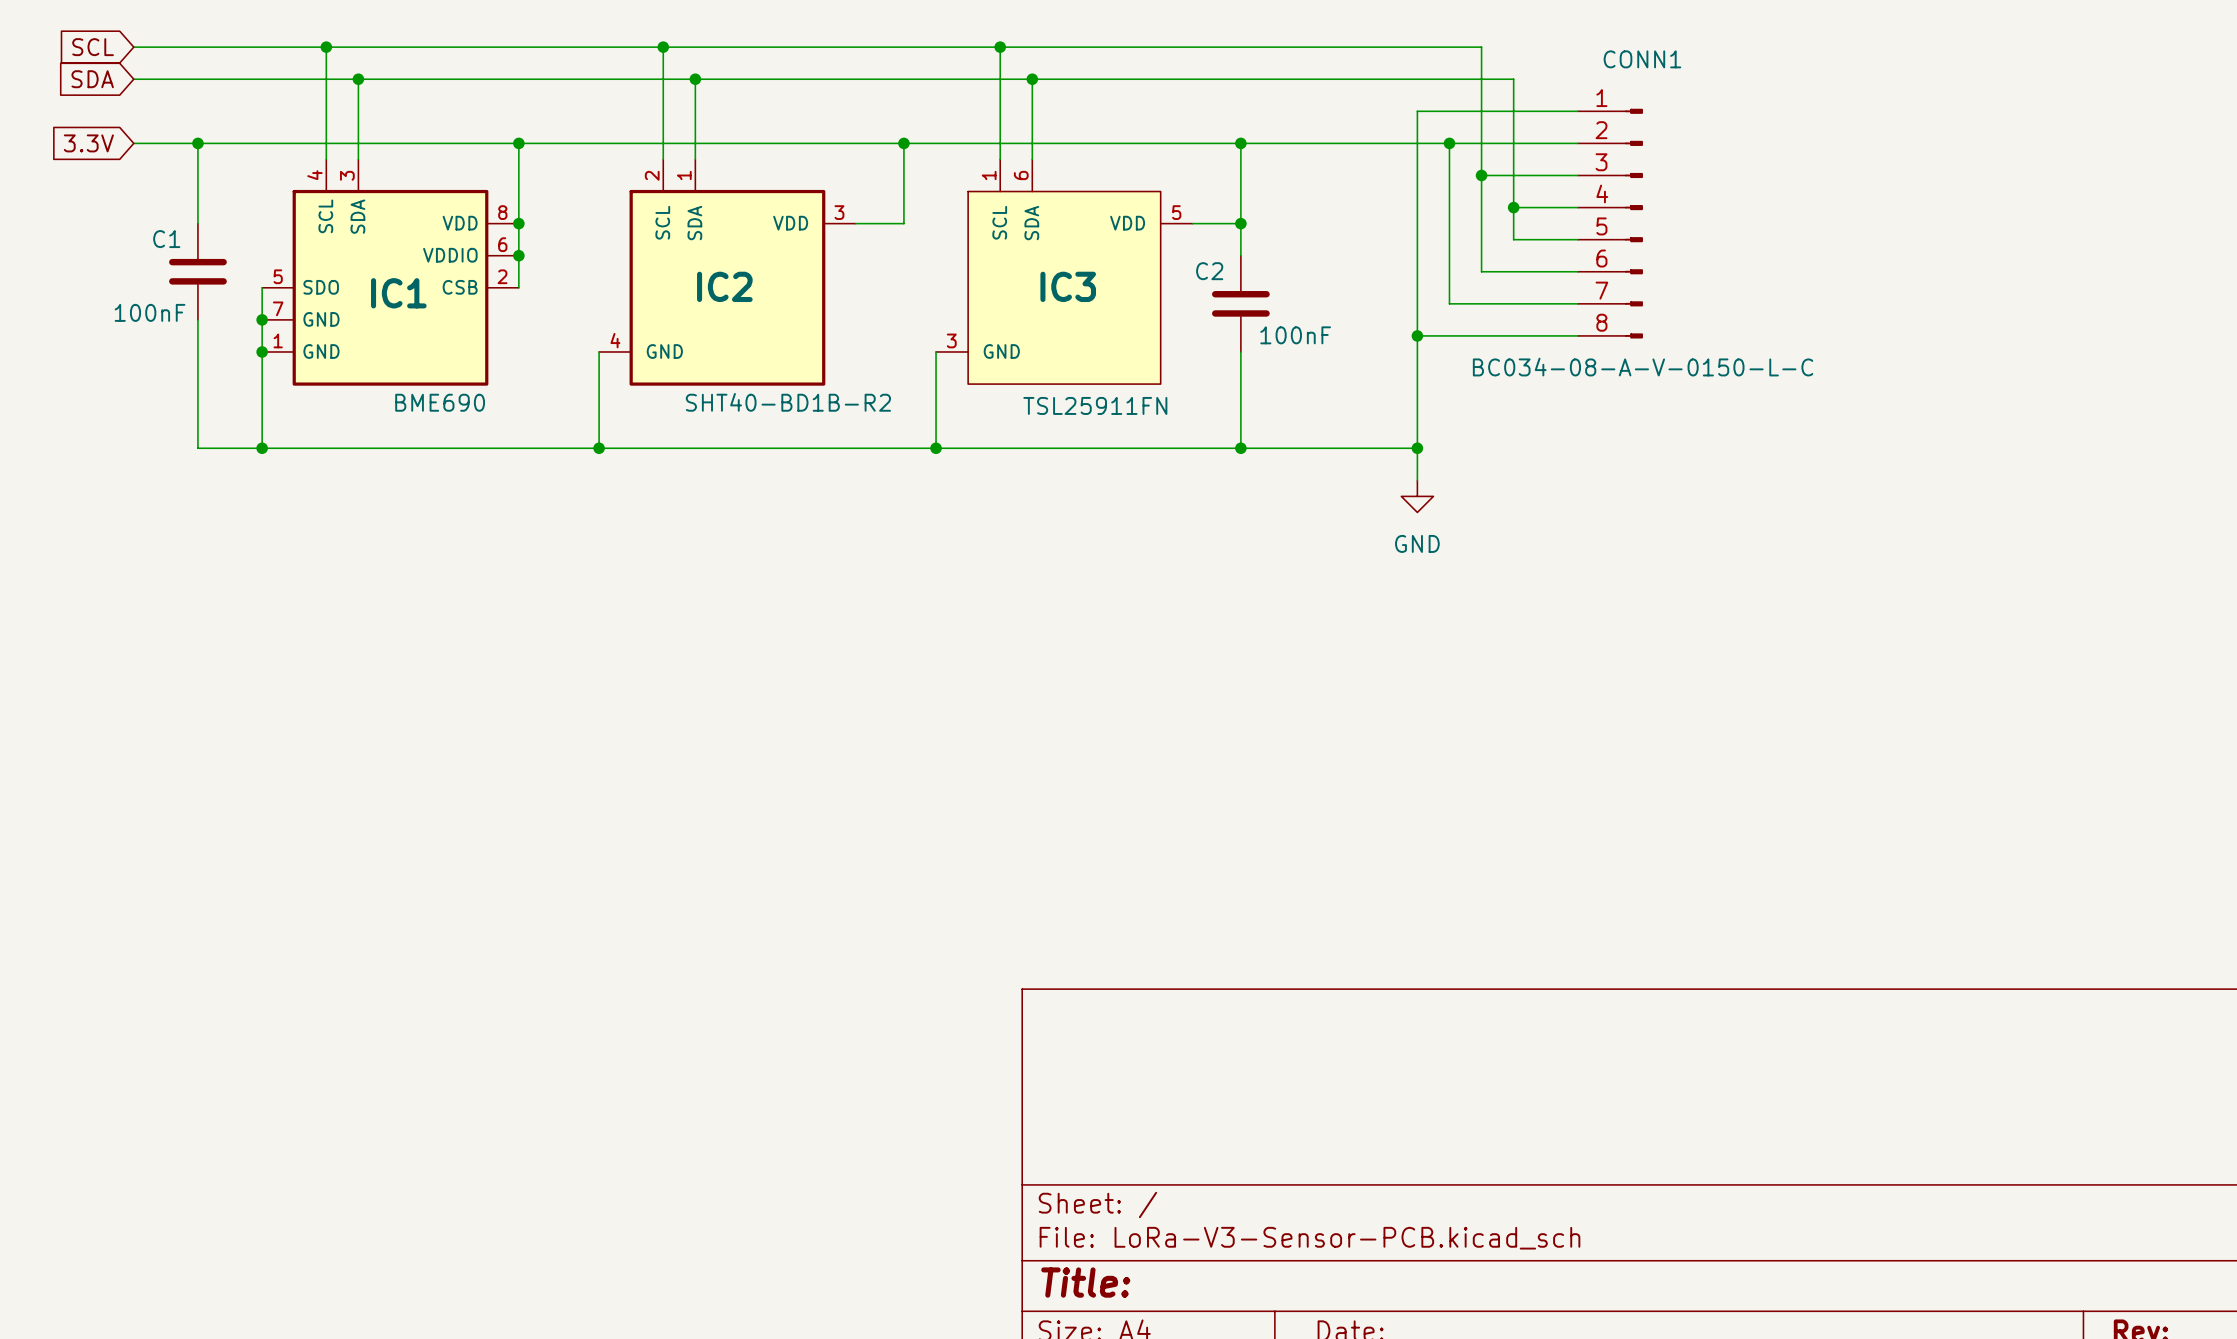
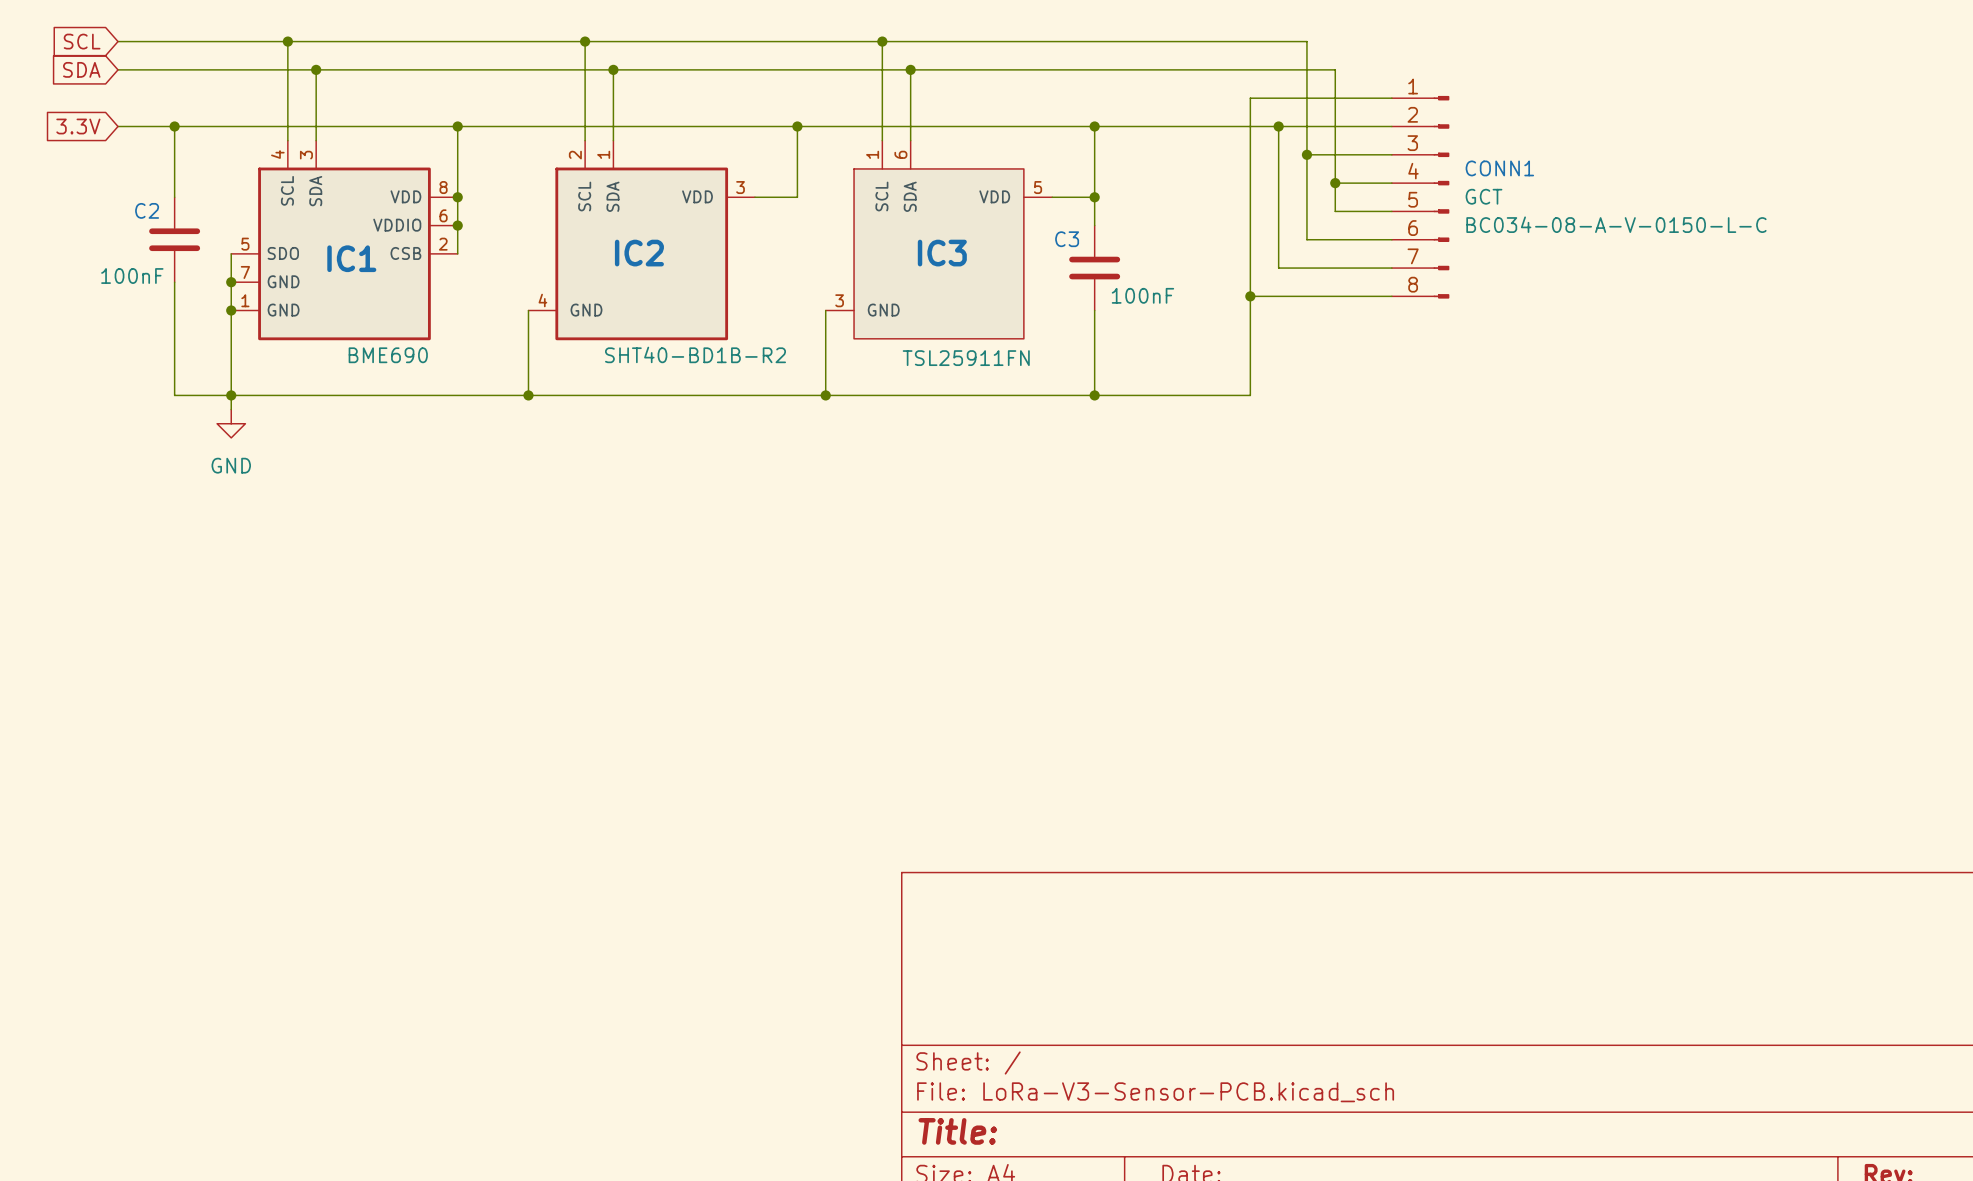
CONN1 name position: CONN1 (1642, 59) -> CONN1 (1499, 168)
CONN1 text: none -> GCT (1484, 196)
C1 name: C1 (166, 239) -> C2 (147, 210)
C2 name: C2 (1209, 271) -> C3 (1067, 239)
CONN1 text position: BC034-08-A-V-0150-L-C (1643, 367) -> BC034-08-A-V-0150-L-C (1616, 224)
wire: none -> (231, 395) (231, 409)
wire: (1417, 448) (1417, 480) -> none
junction: (1417, 448) -> none
power symbol: none -> GND (231, 423)
power symbol: GND (1417, 496) -> none

